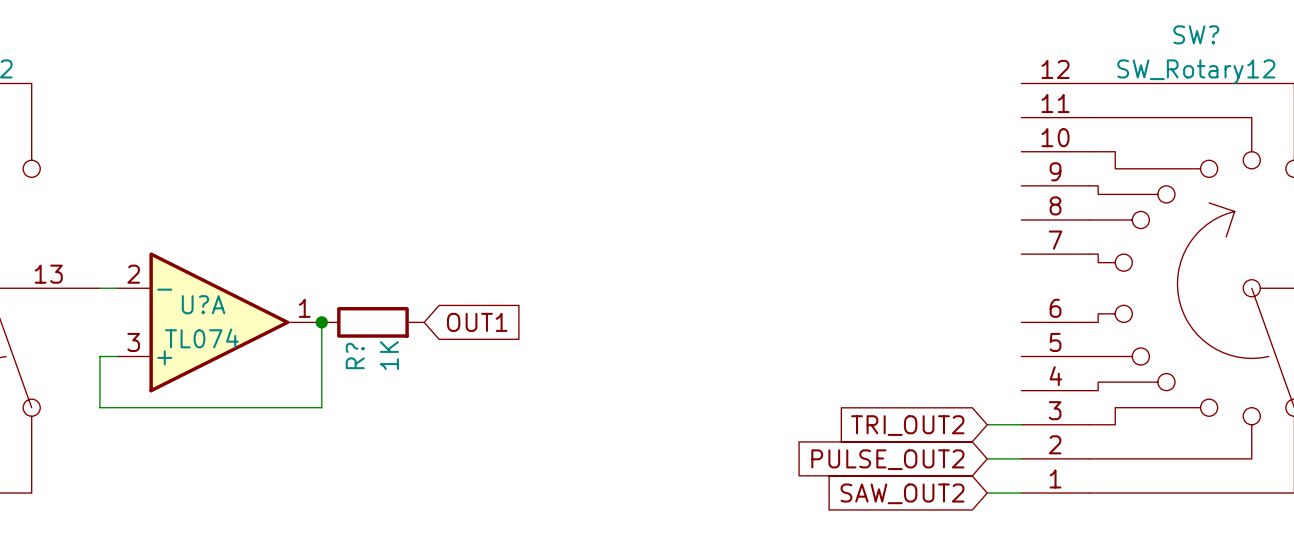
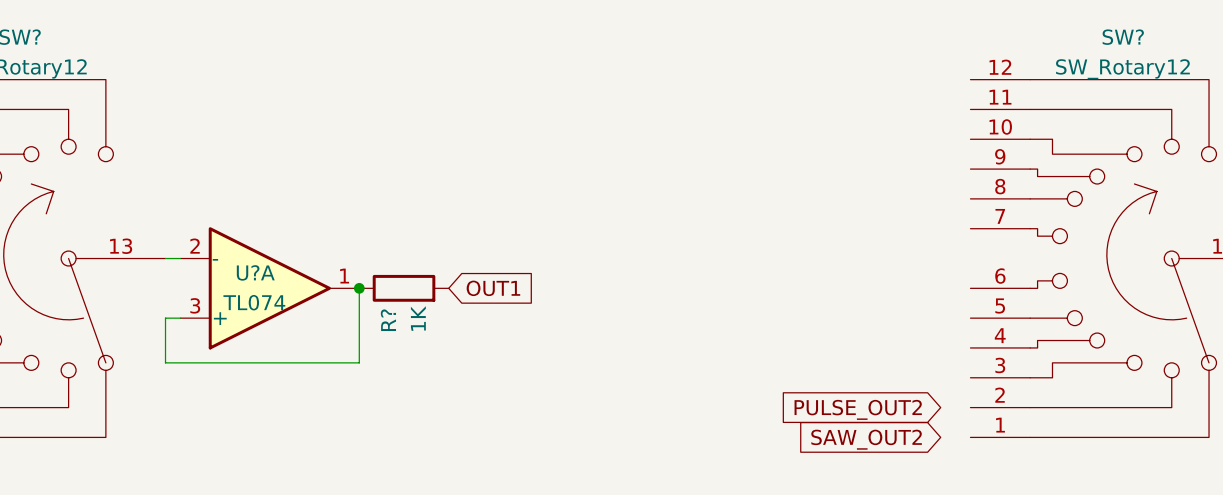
wire: (987, 424) (1021, 424) -> none
global label: TRI_OUT2 (907, 425) -> none
wire: (987, 458) (1021, 458) -> none
wire: (987, 493) (1021, 493) -> none

